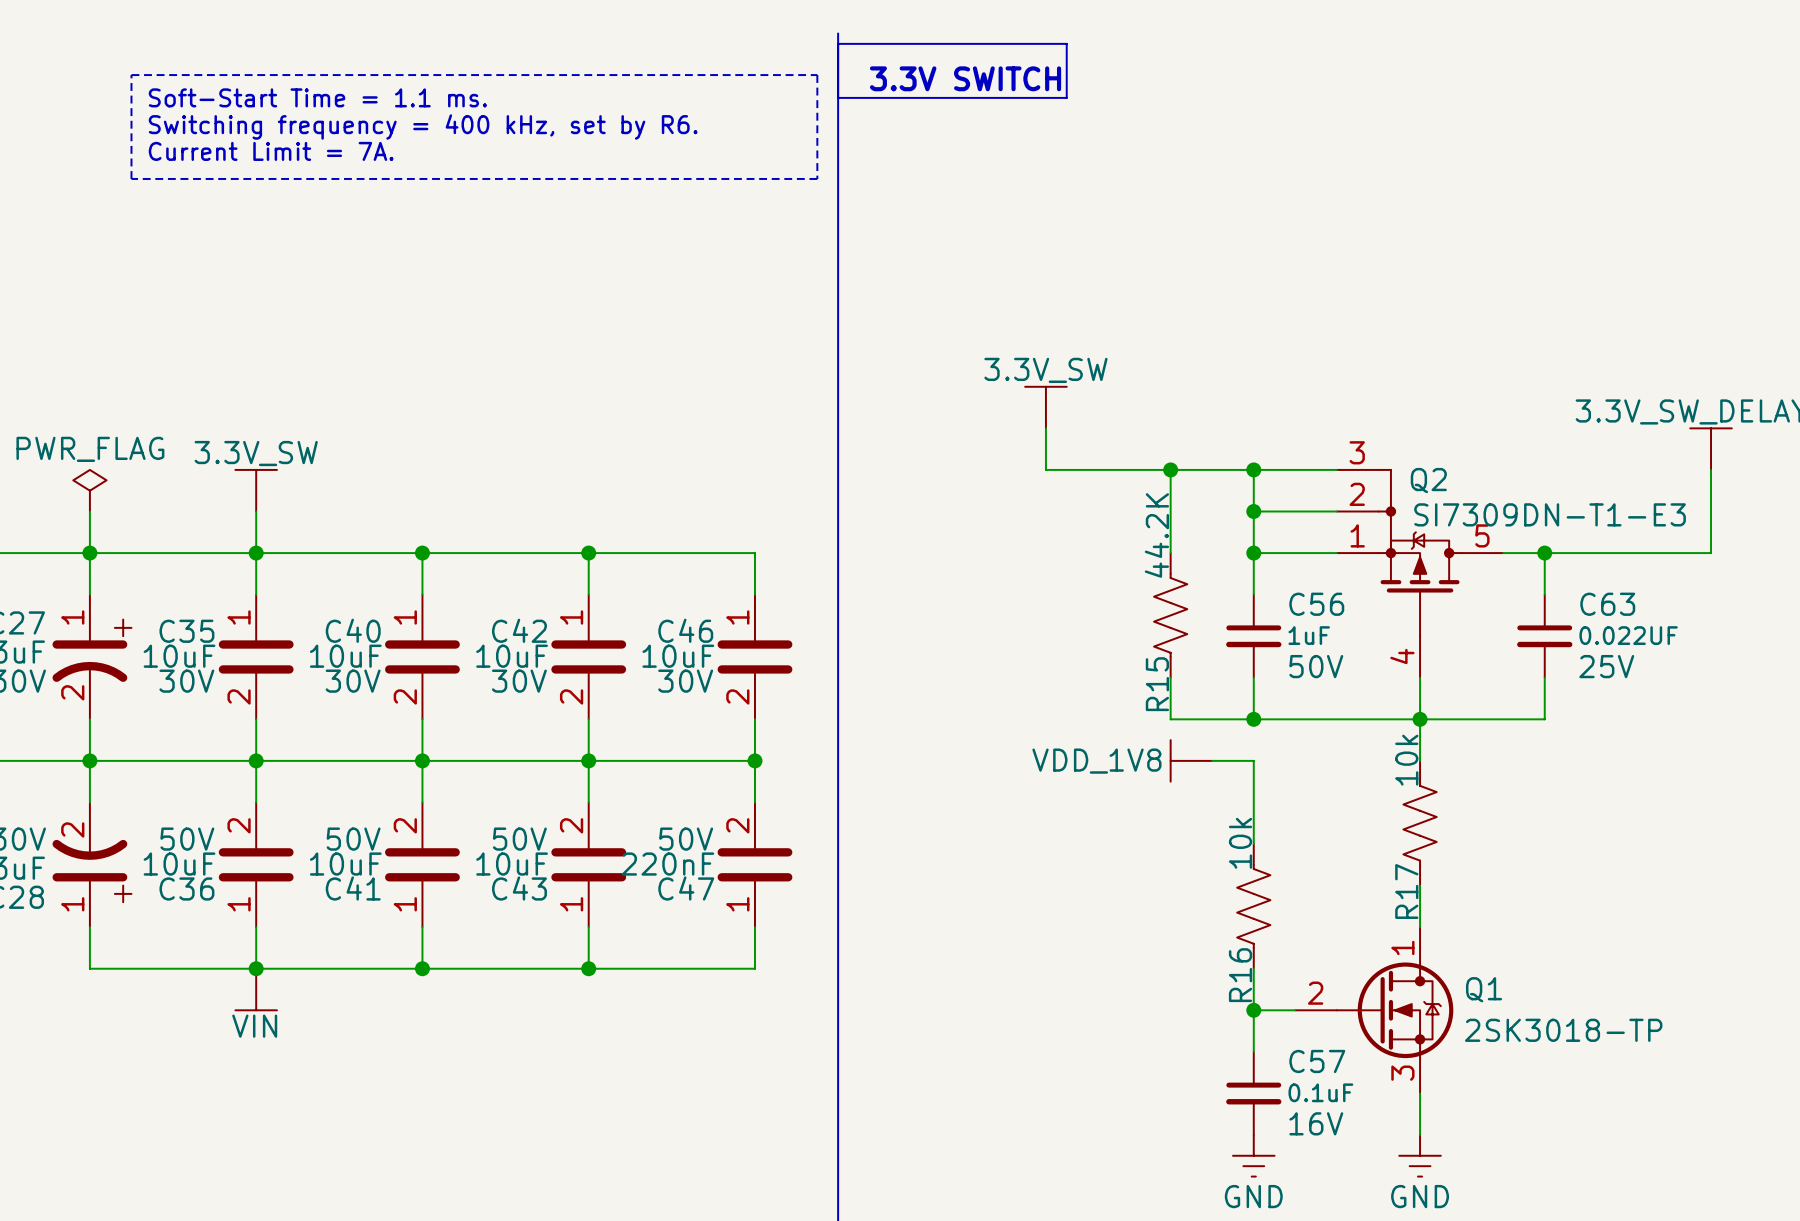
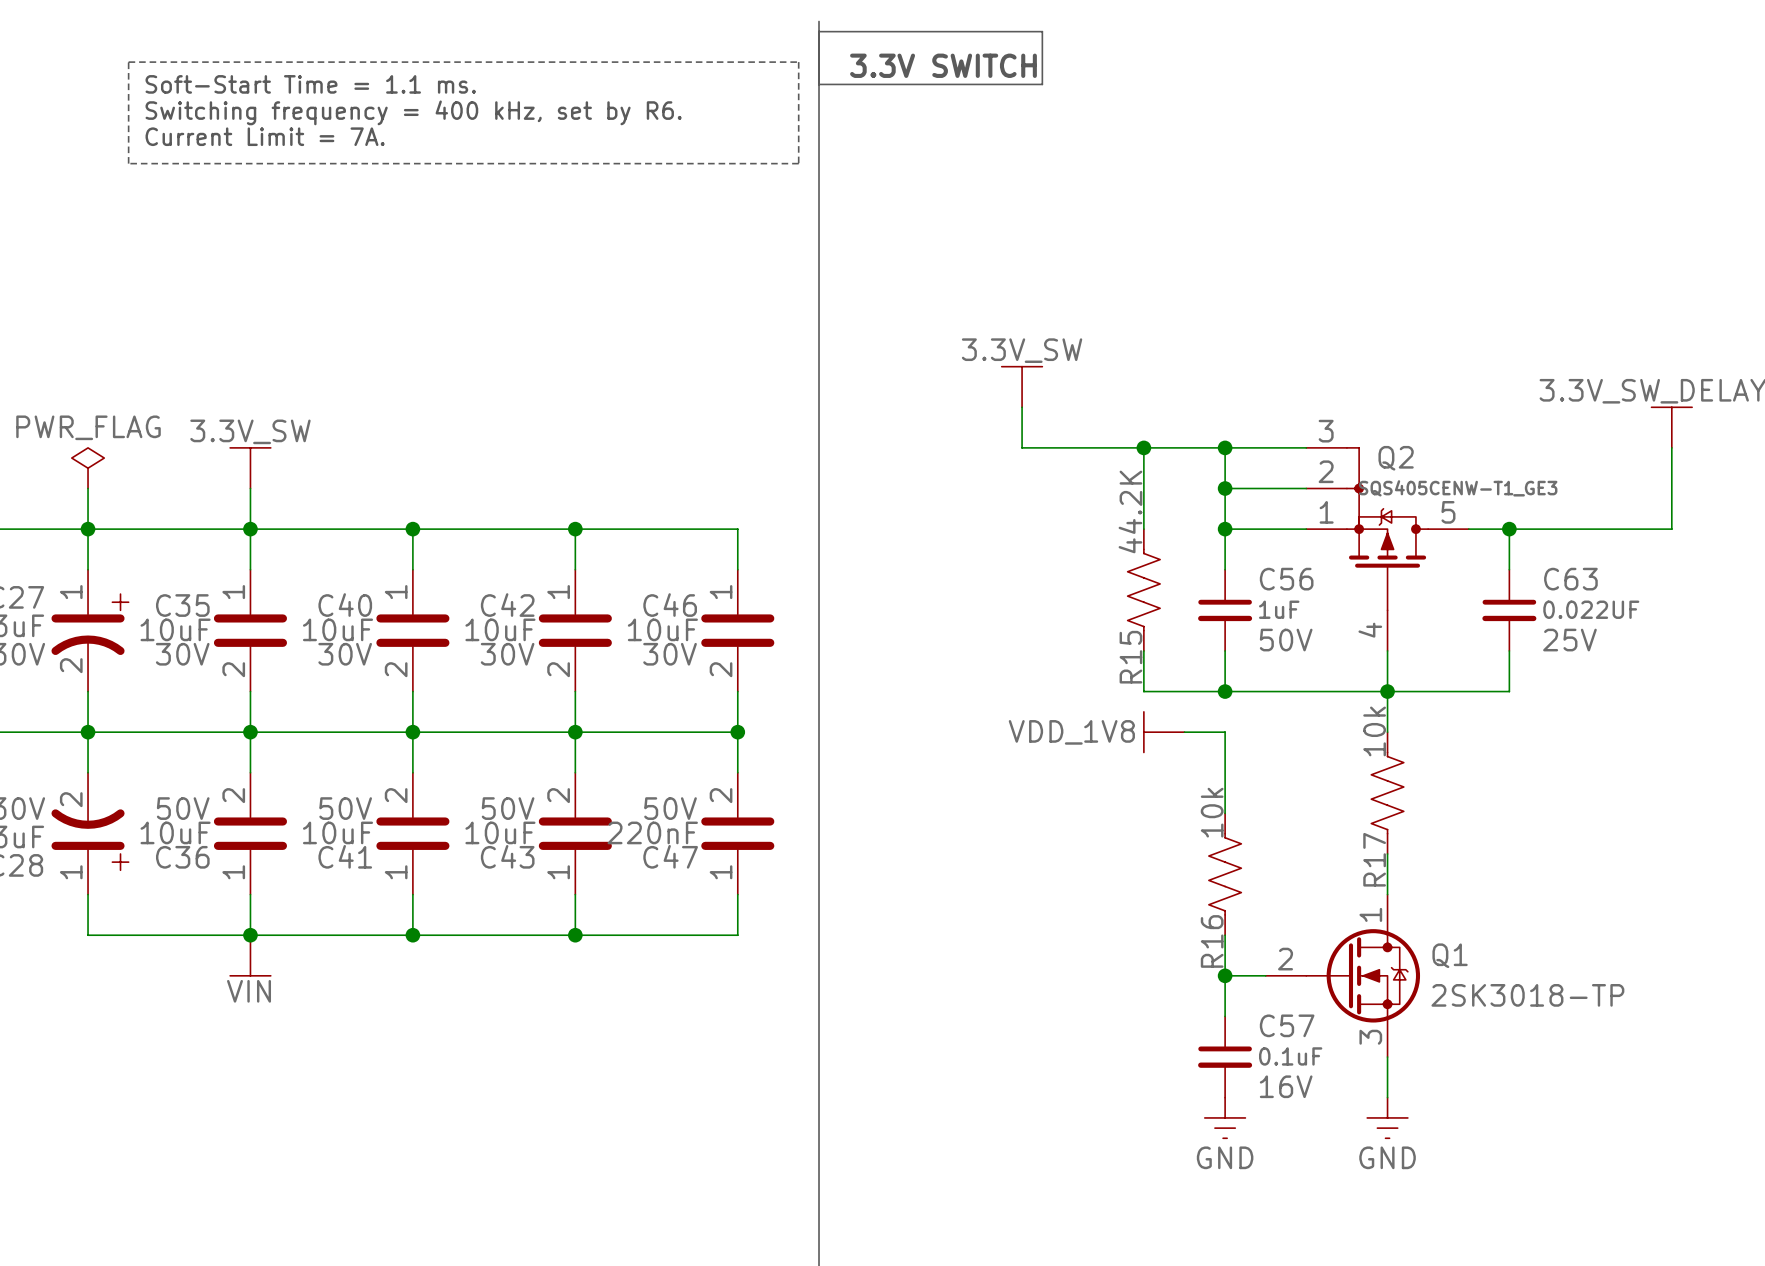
Q2 value: SI7309DN-T1-E3 (1550, 514) -> SQS405CENW-T1_GE3 (1458, 488)

